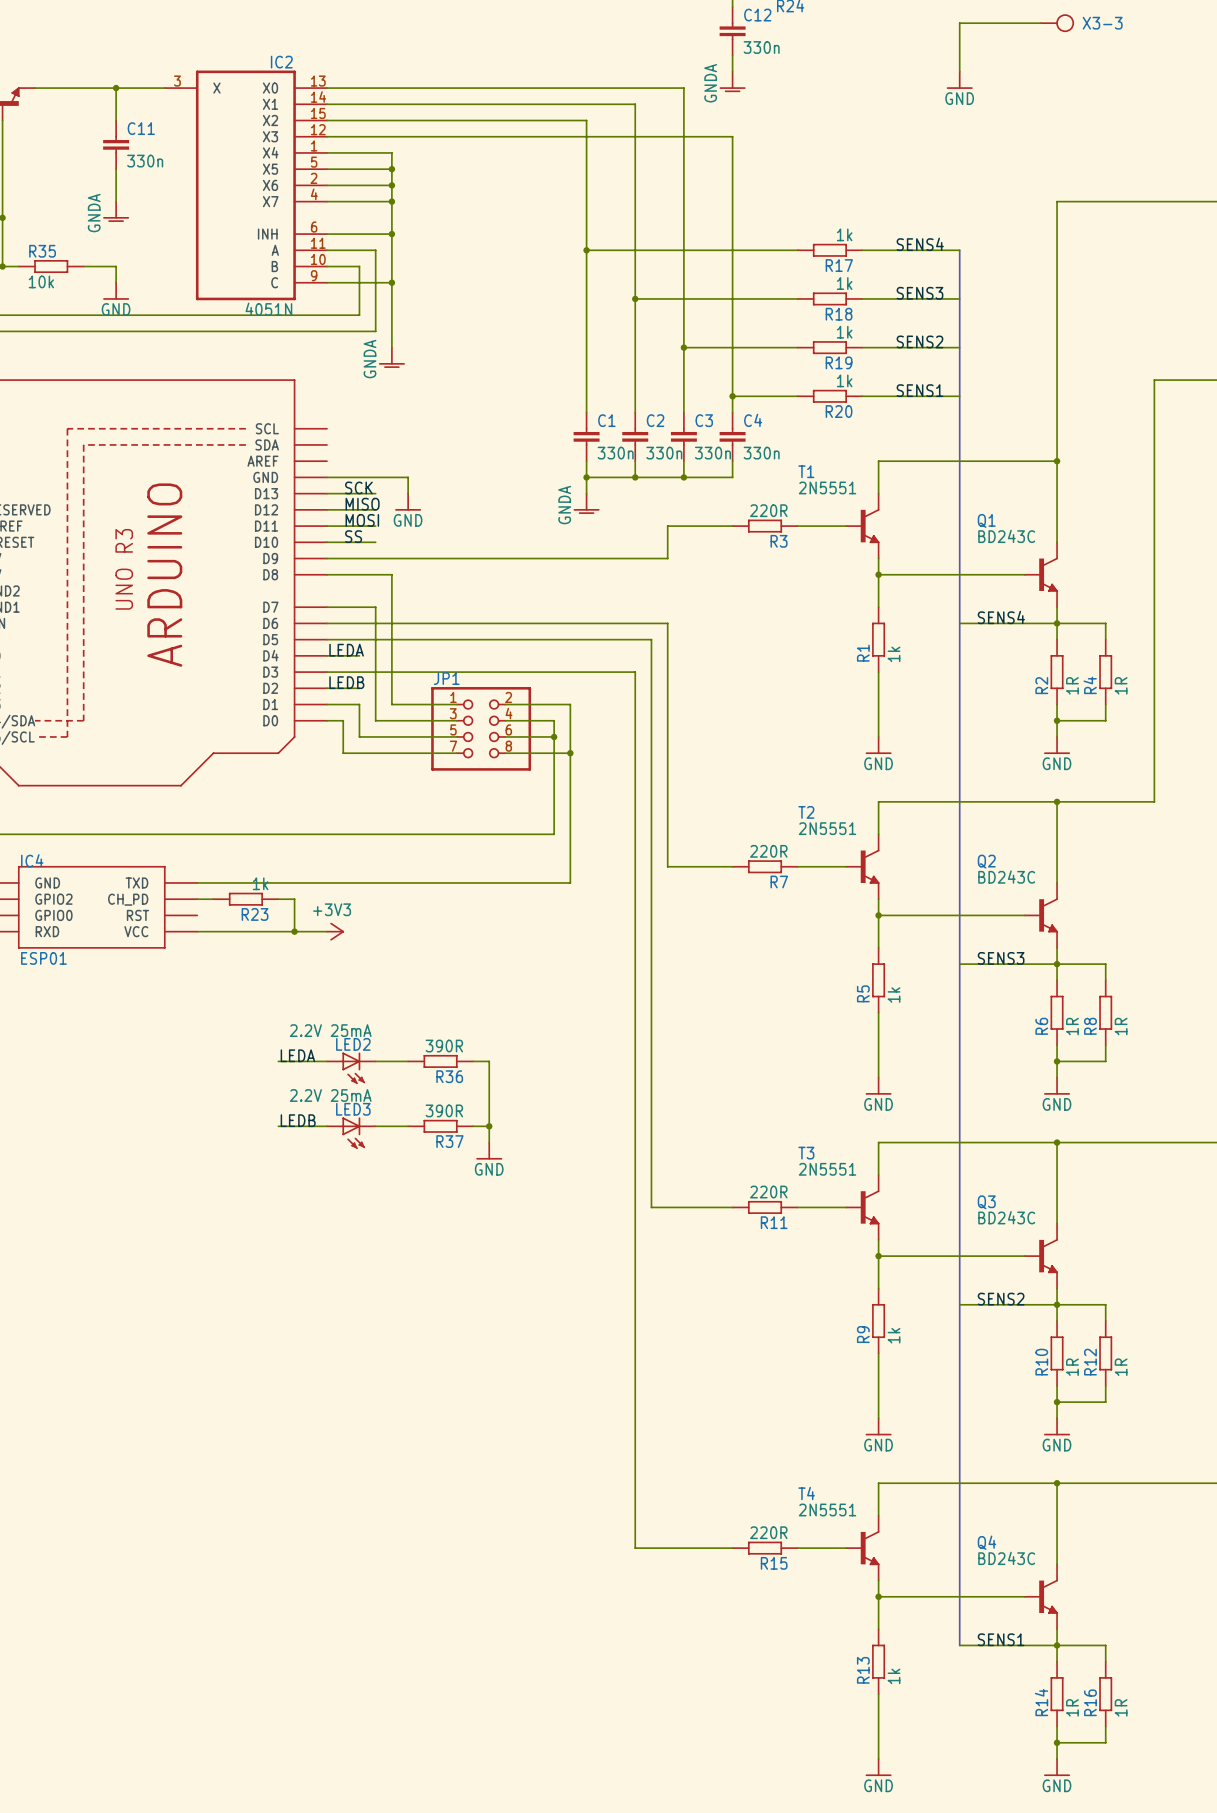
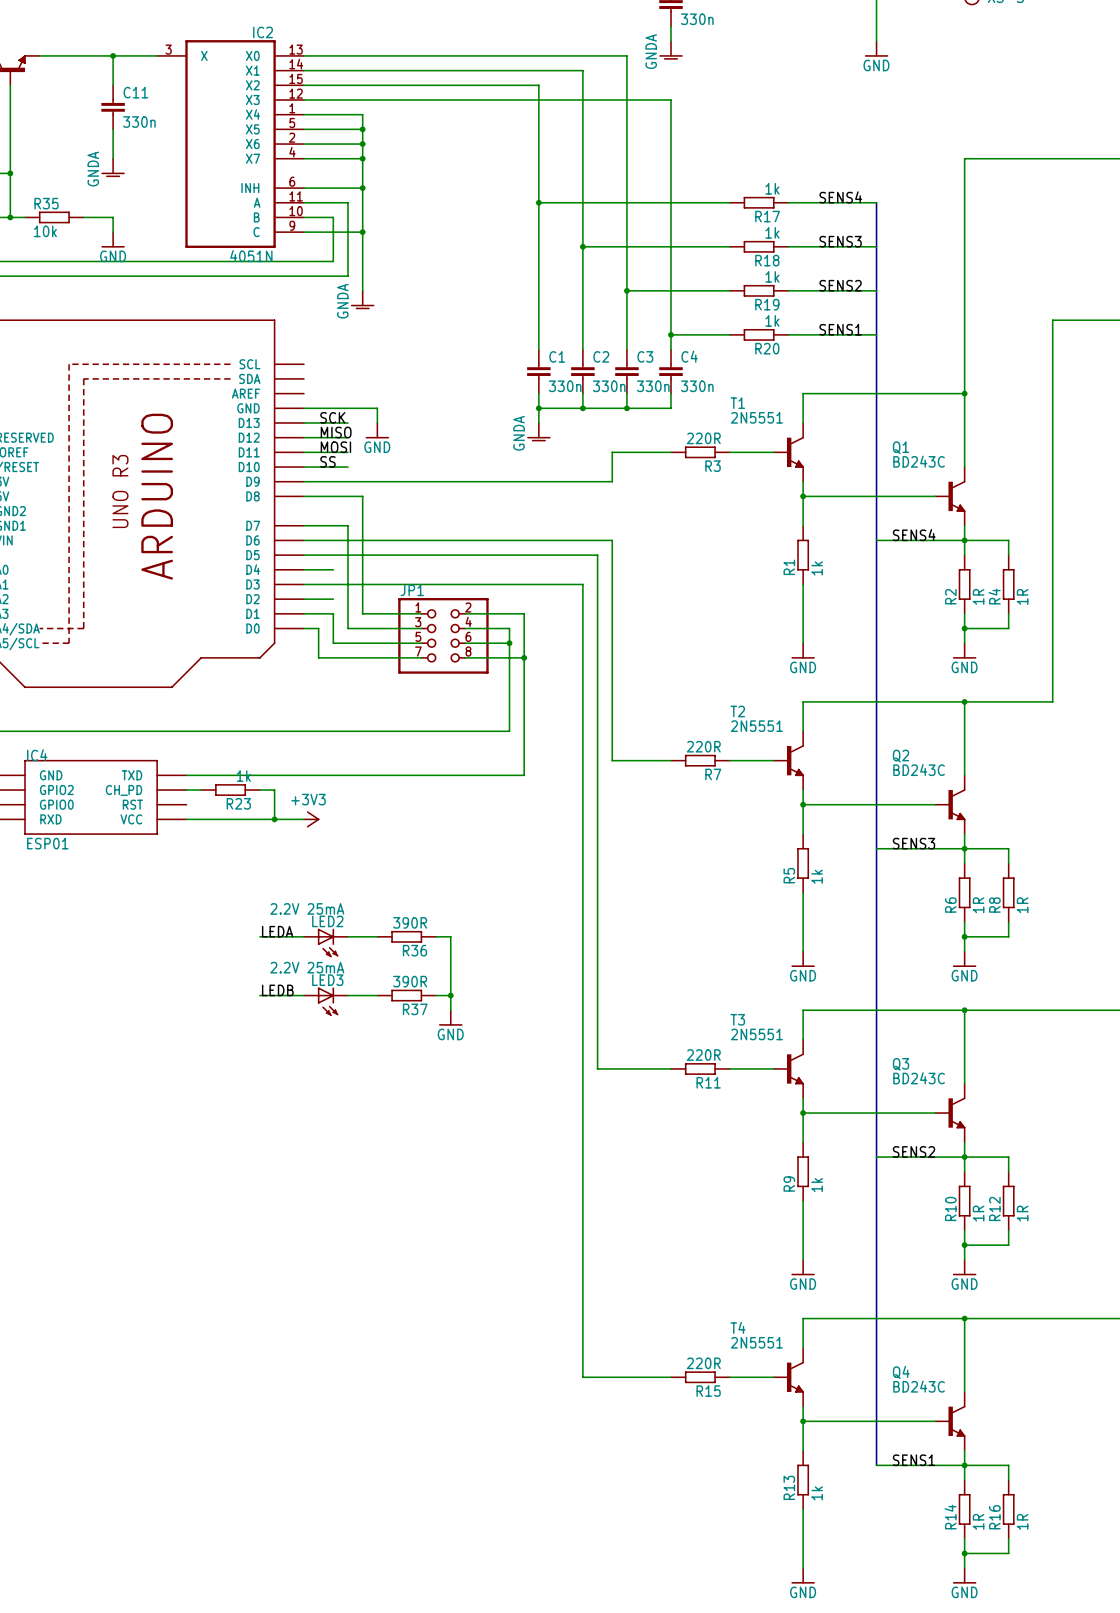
label: LEDA (346, 650) -> none
label: LEDB (346, 682) -> none

